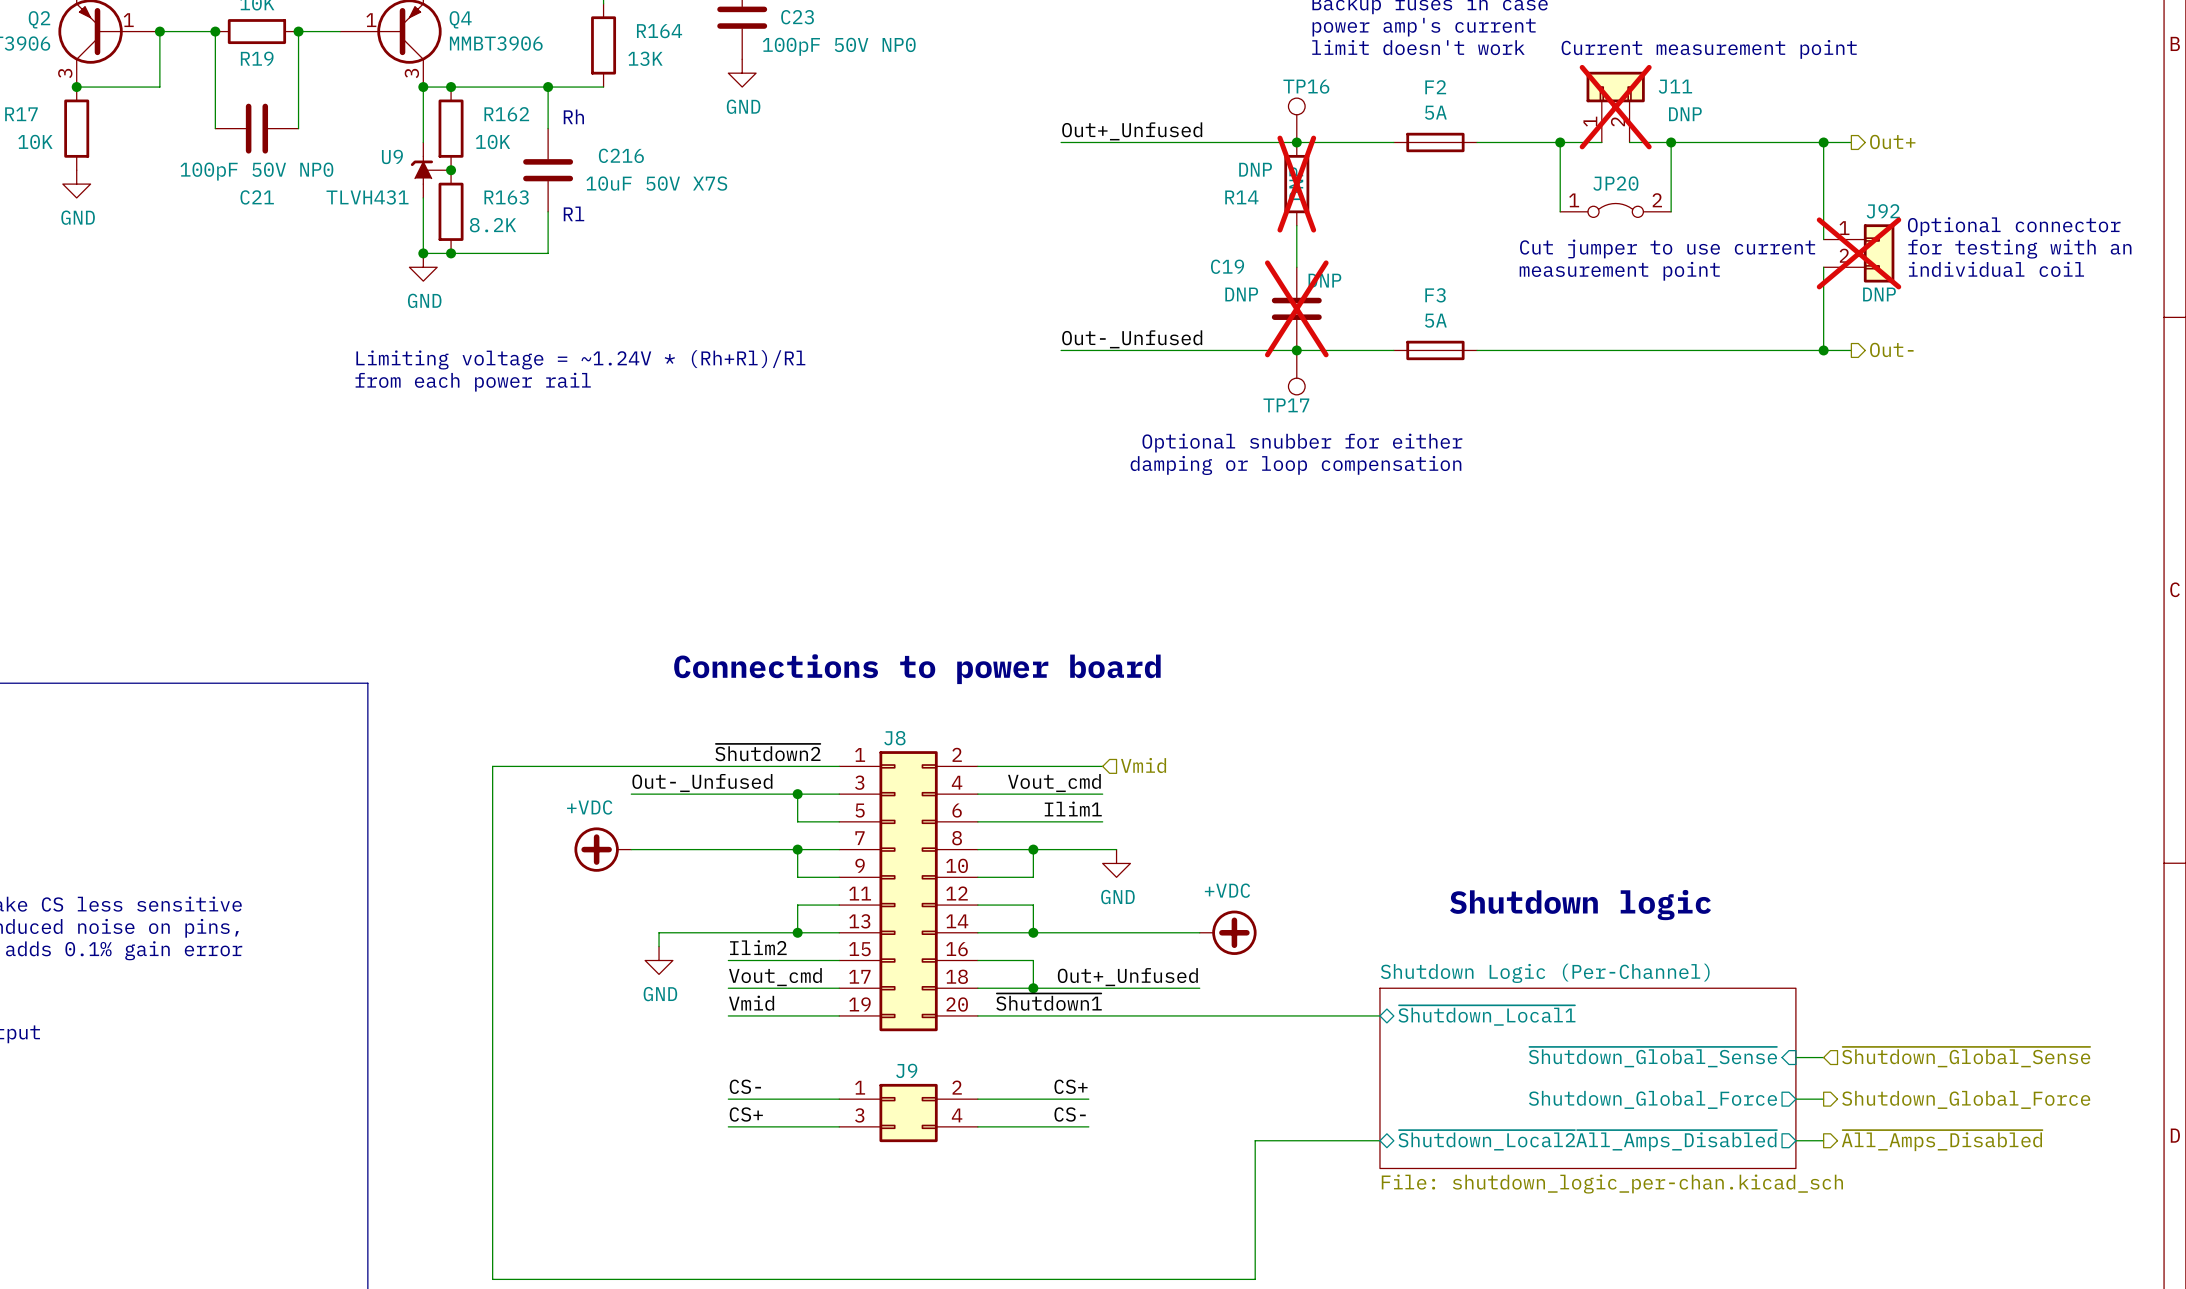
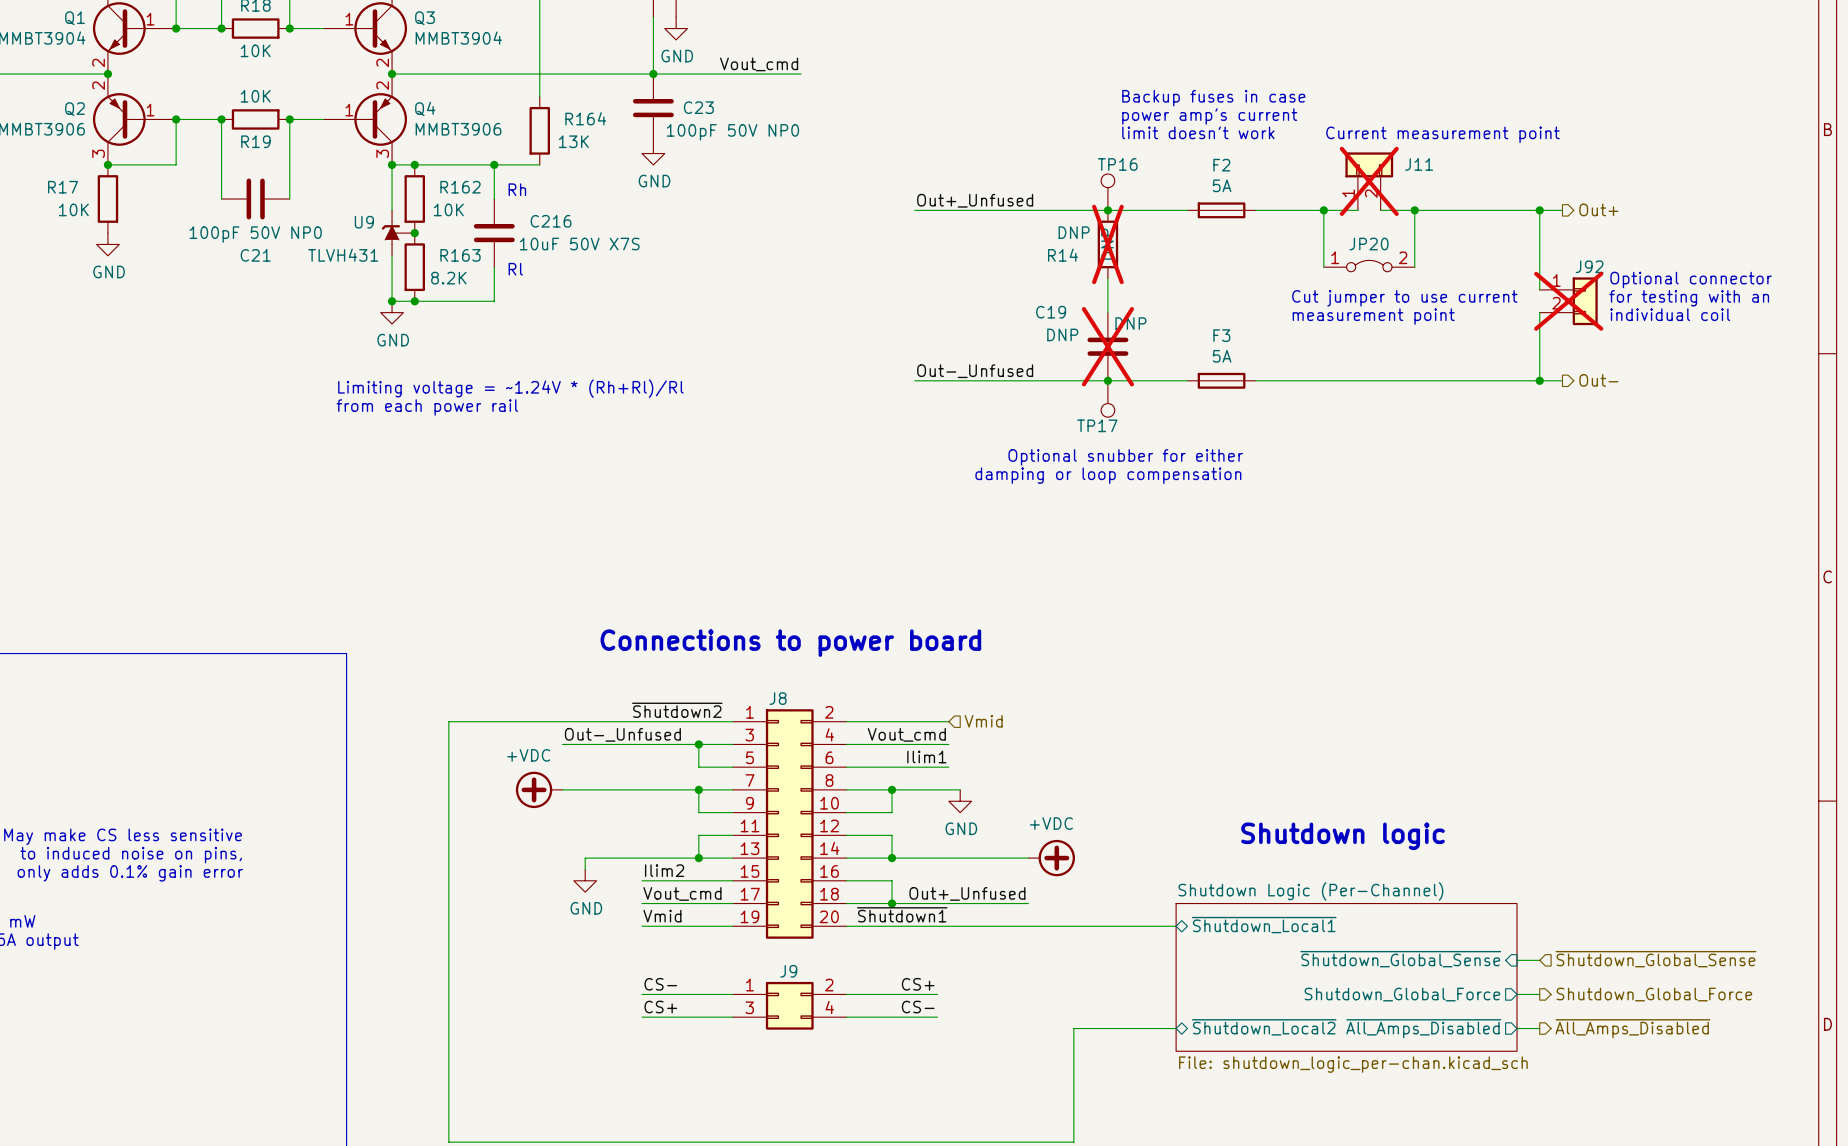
J11 text: DNP (1685, 114) -> none
J92 text: DNP (1879, 294) -> none

